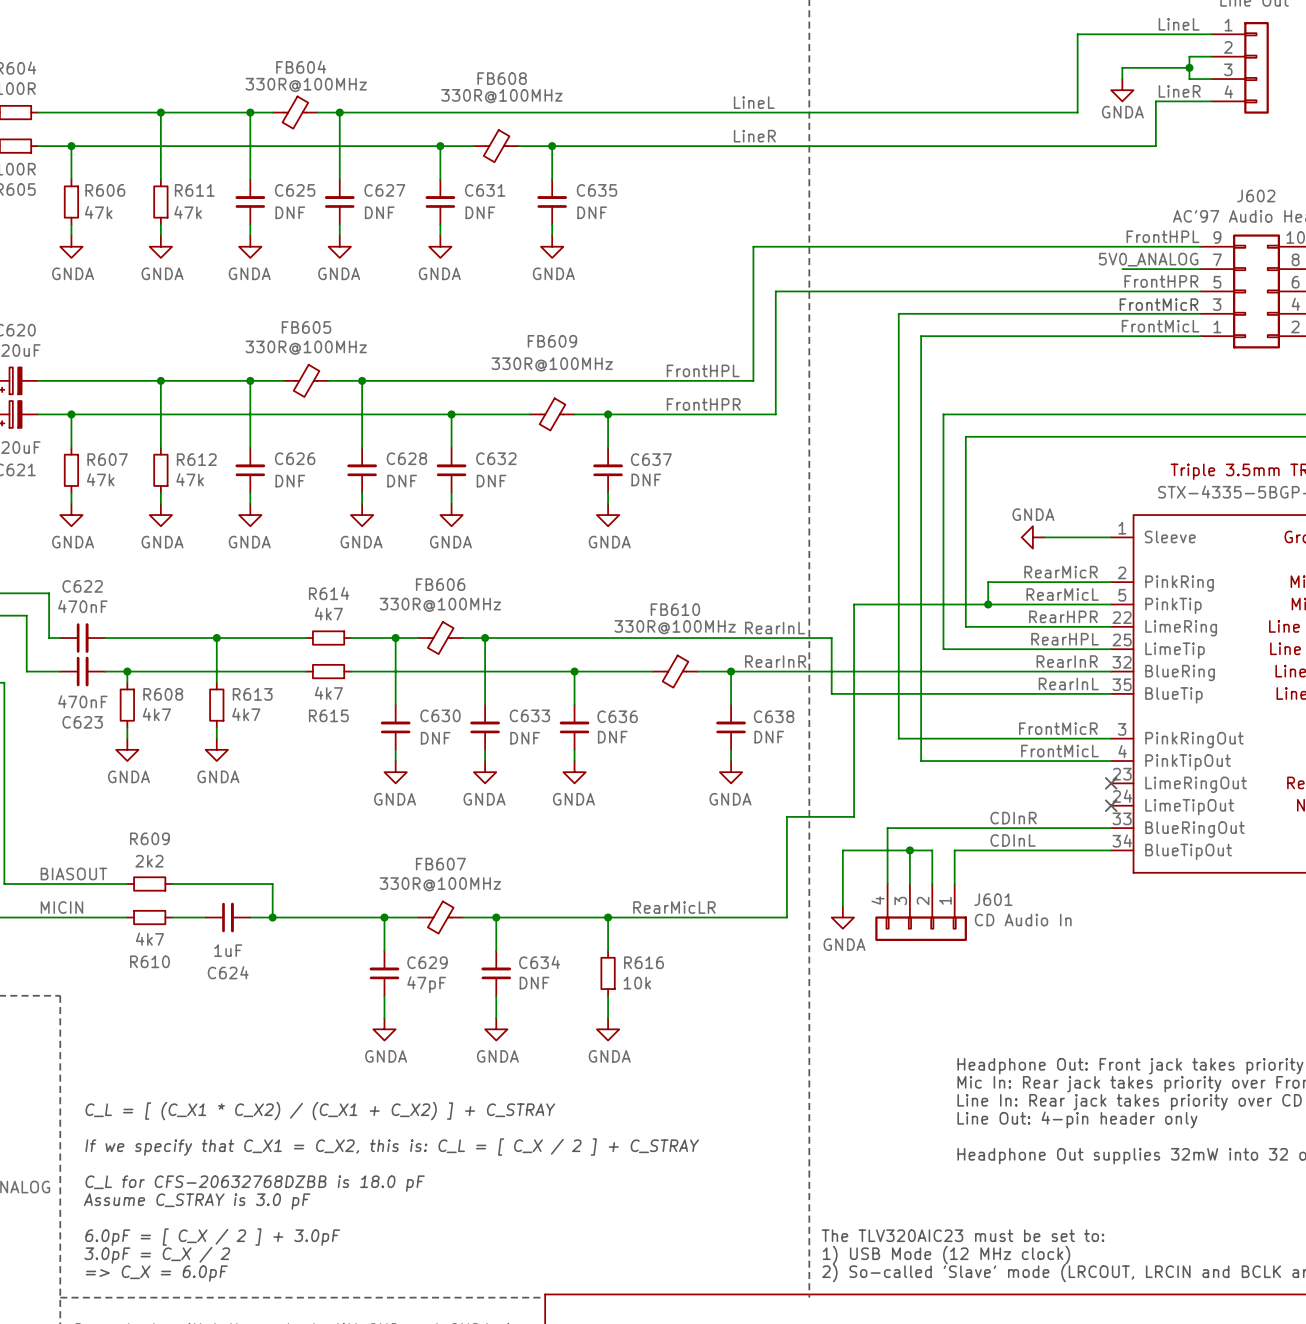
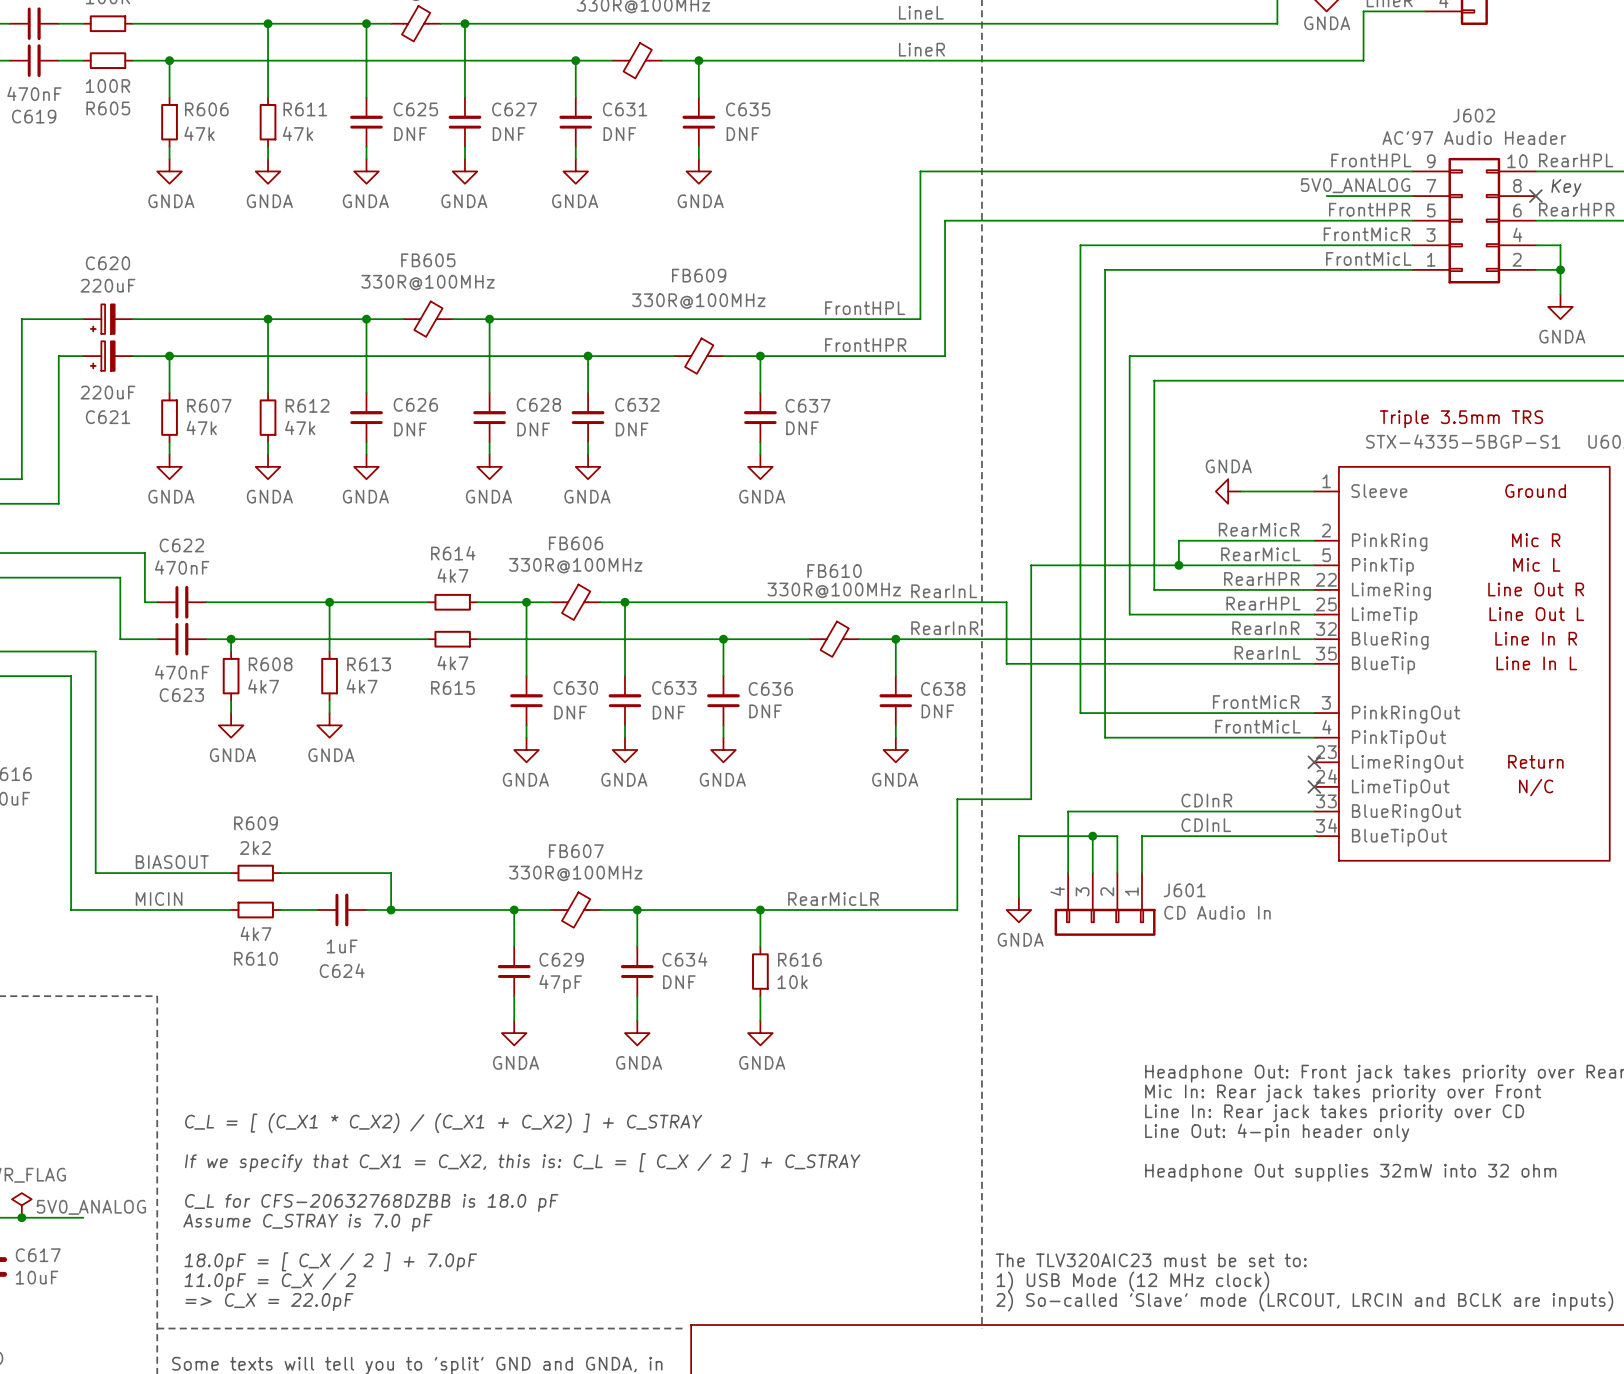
label: none -> FrontMicR (1366, 234)
text: FrontMicR (1159, 304) -> none
text: Assume C_STRAY is 3.0 pF (197, 1201) -> Assume C_STRAY is 7.0 pF (307, 1222)
text: 6.0pF = [ C_X / 2 ] + 3.0pF (212, 1237) -> 18.0pF = [ C_X / 2 ] + 7.0pF (330, 1261)
text: 3.0pF = C_X / 2 (157, 1255) -> 11.0pF = C_X / 2 (270, 1281)
text: => C_X = 6.0pF (156, 1273) -> => C_X = 22.0pF (269, 1302)

